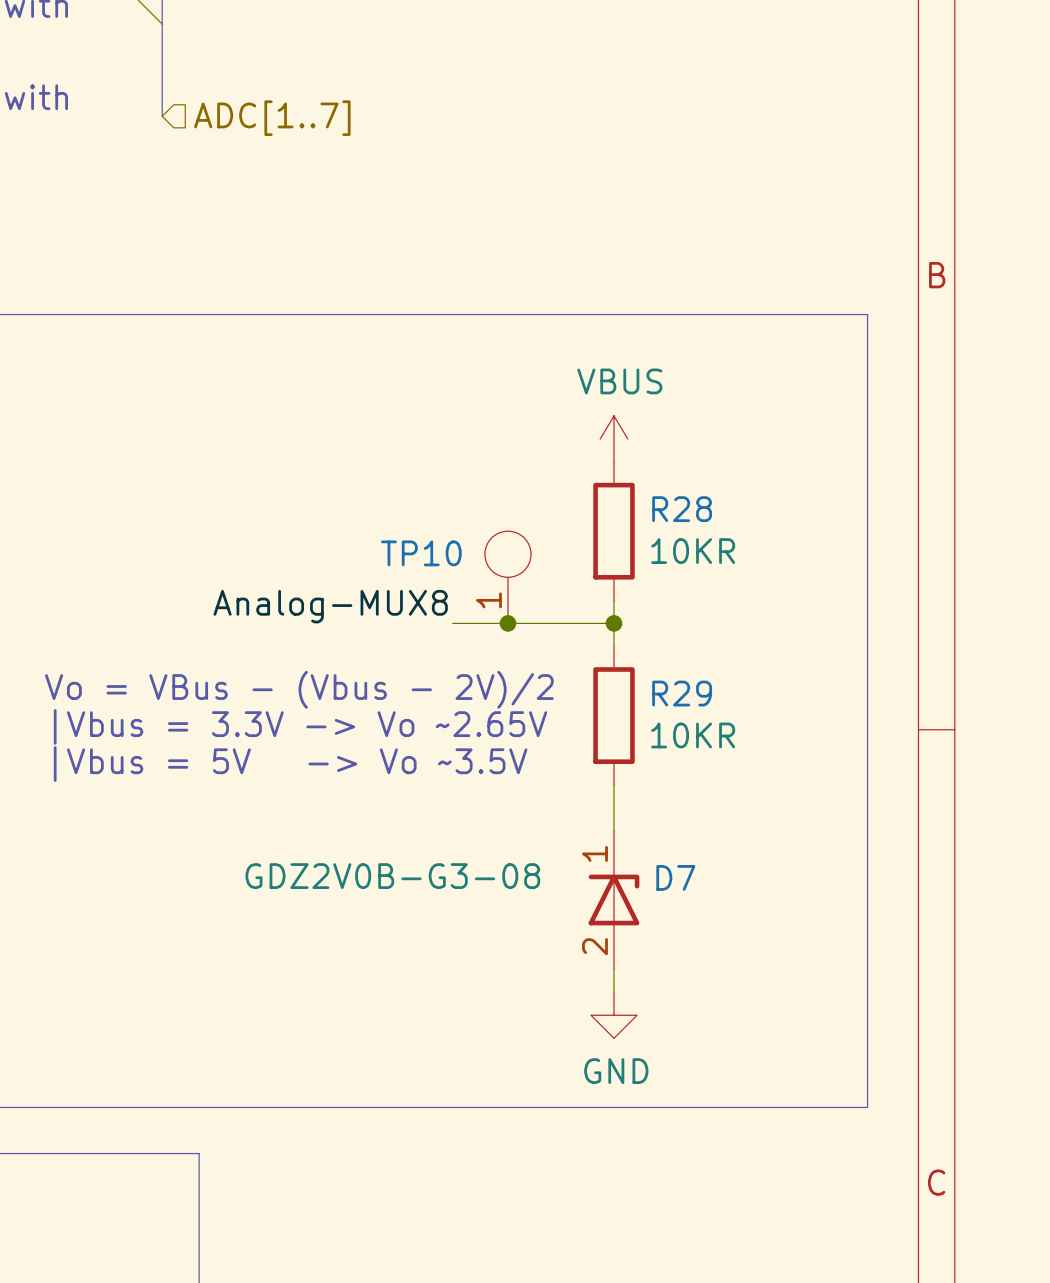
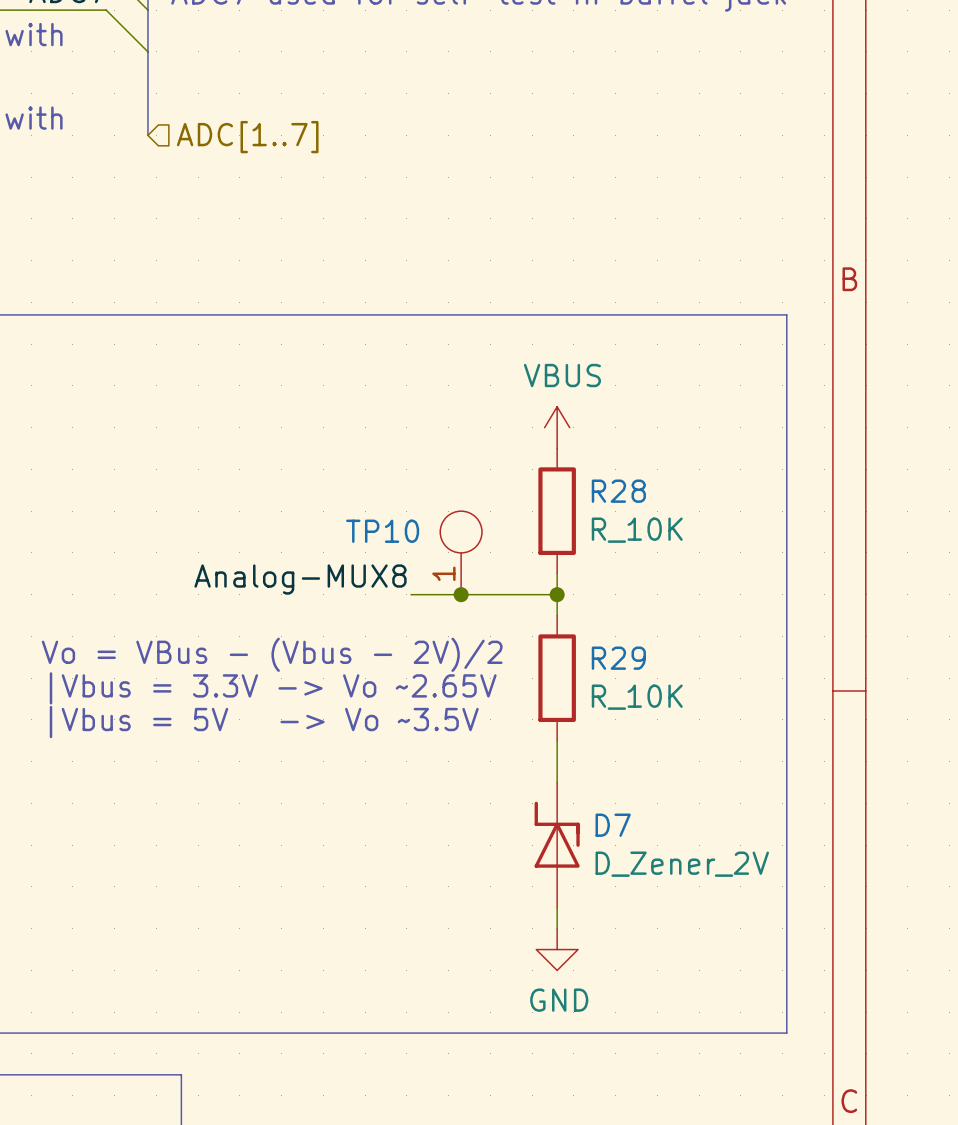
R28 value: 10KR (693, 551) -> R_10K (637, 530)
R29 value: 10KR (693, 735) -> R_10K (637, 697)
D7 symbol: [588, 830, 640, 970] -> [534, 782, 580, 908]
D7 value: GDZ2V0B-G3-08 (392, 876) -> D_Zener_2V (682, 864)

